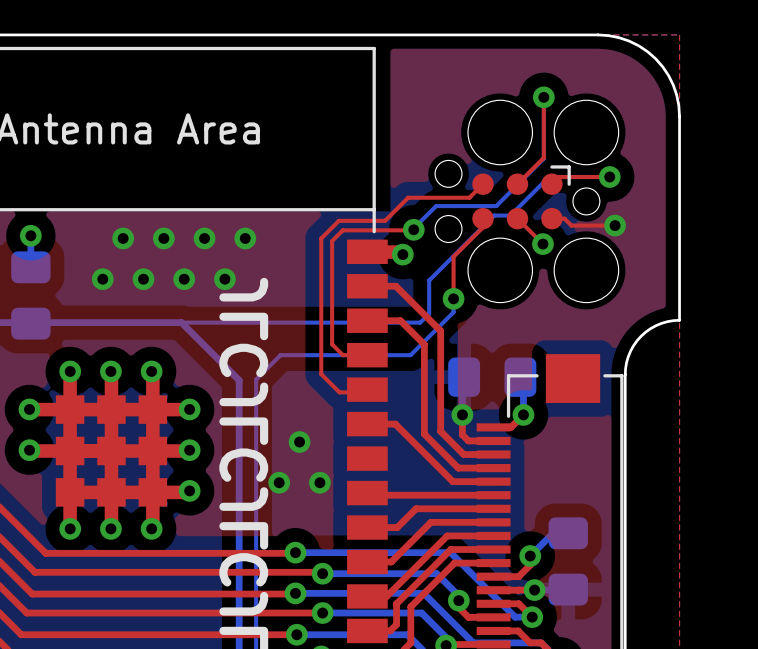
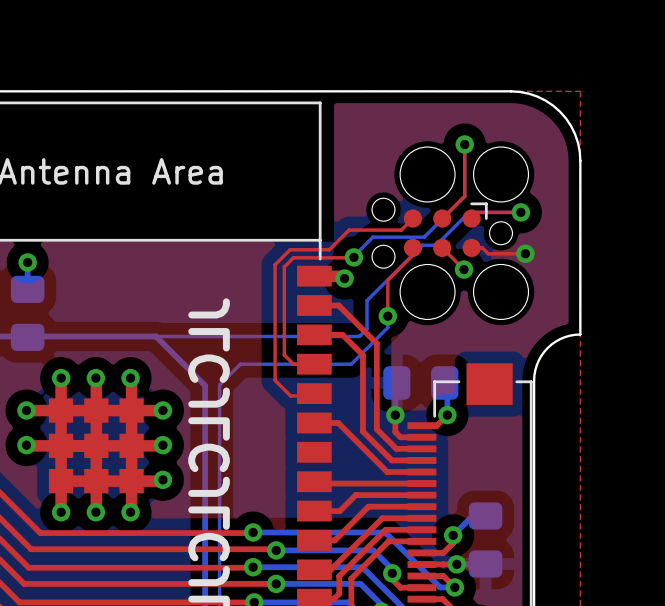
via: (123, 238) -> none
via: (163, 238) -> none
via: (204, 238) -> none
via: (245, 238) -> none
via: (102, 279) -> none
via: (143, 279) -> none
via: (184, 279) -> none
via: (224, 279) -> none
via: (299, 442) -> none
via: (279, 482) -> none
via: (319, 482) -> none

